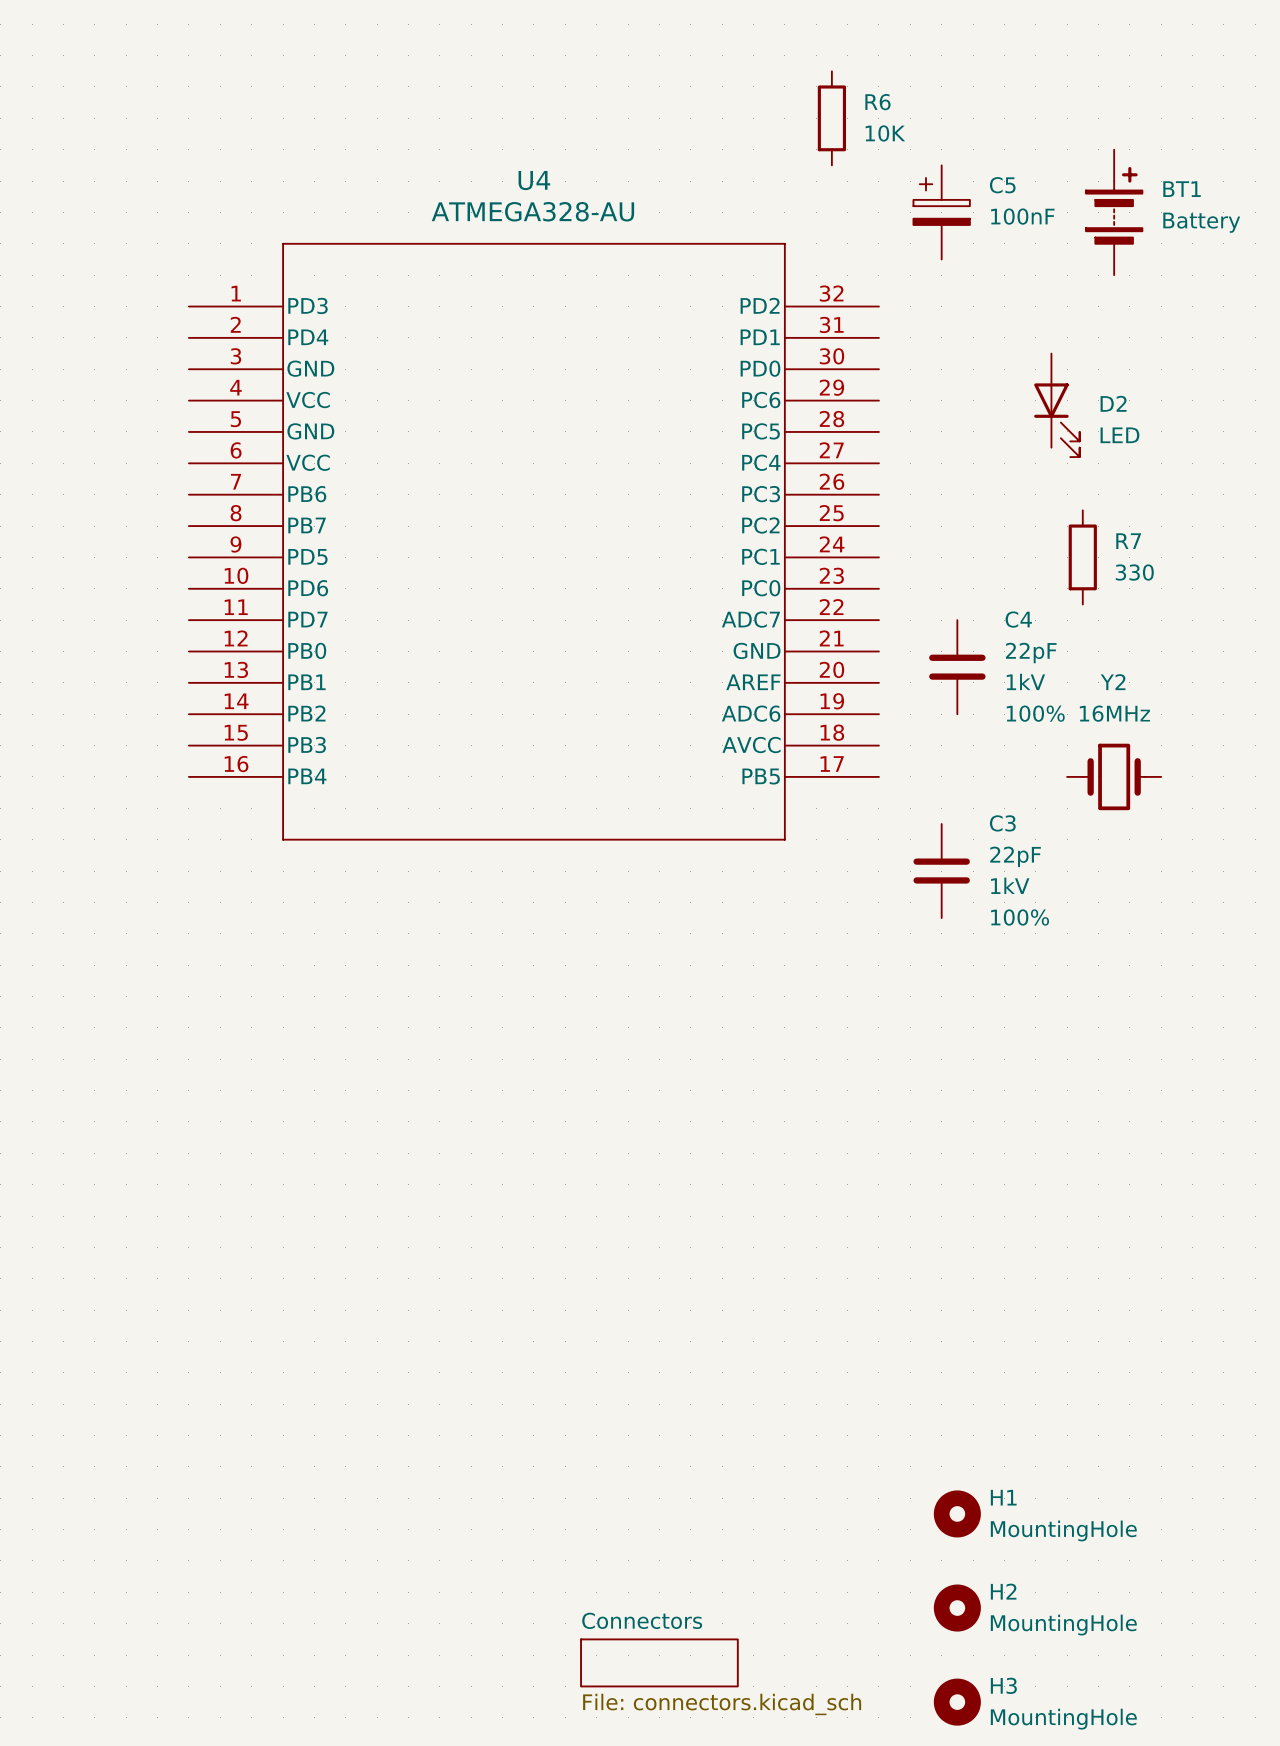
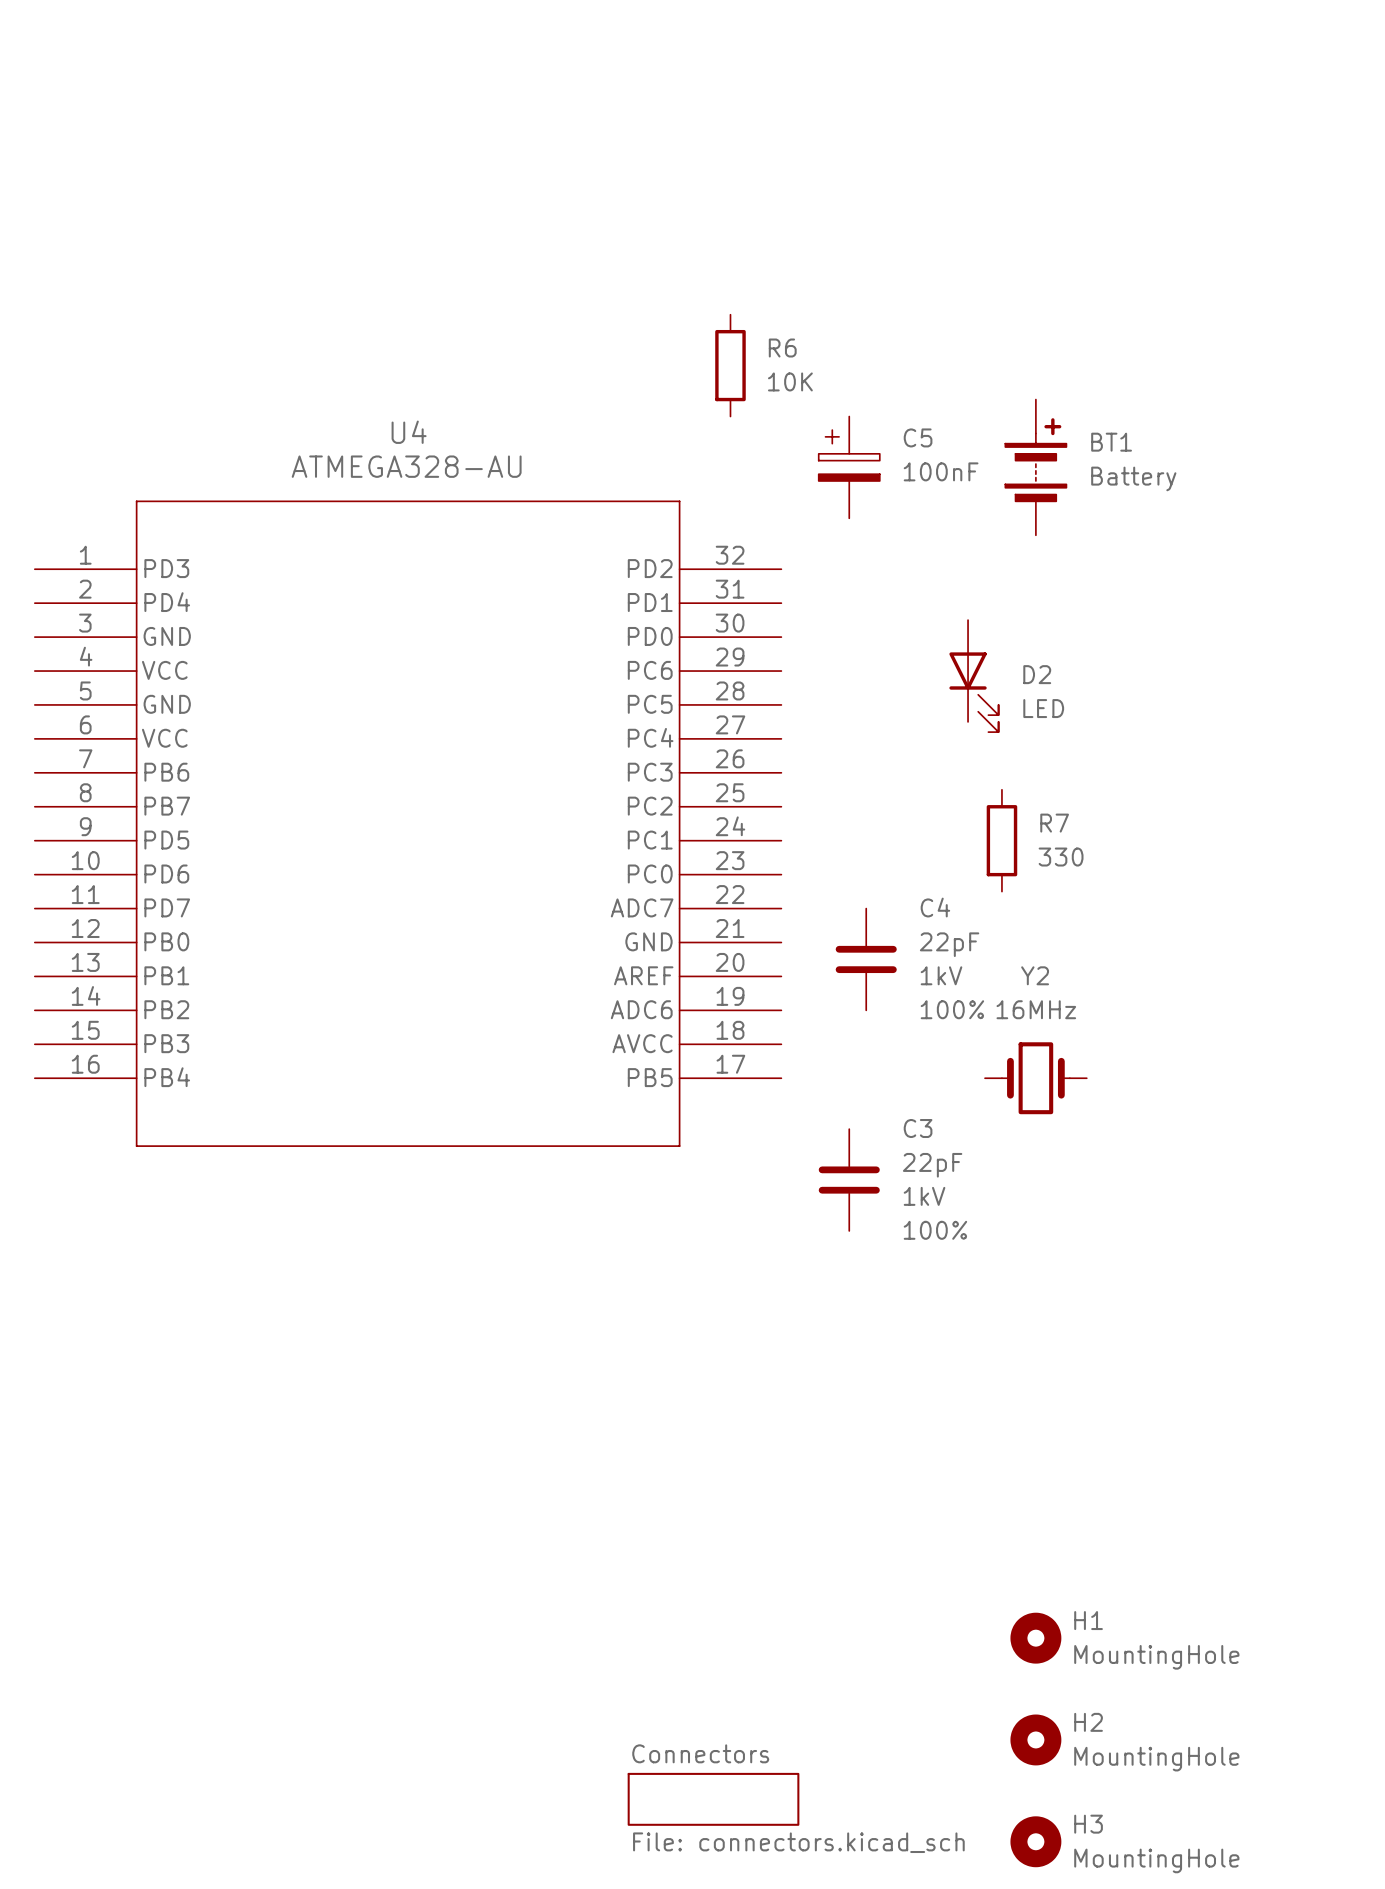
R6 position: (831, 118) -> (730, 365)
C5 position: (941, 212) -> (849, 467)
BT1 position: (1114, 212) -> (1035, 467)
D2 position: (1056, 405) -> (973, 676)
U4 position: (533, 541) -> (408, 823)
R7 position: (1082, 557) -> (1001, 840)
C4 position: (957, 667) -> (866, 959)
Y2 position: (1114, 776) -> (1035, 1078)
C3 position: (941, 871) -> (849, 1180)

